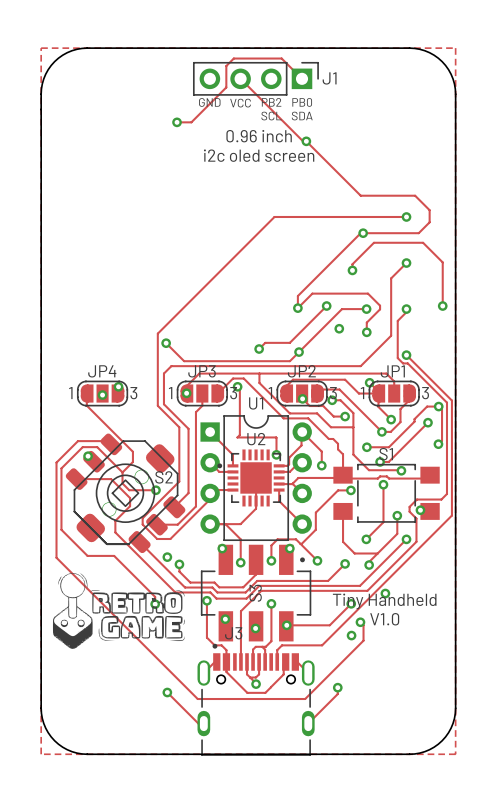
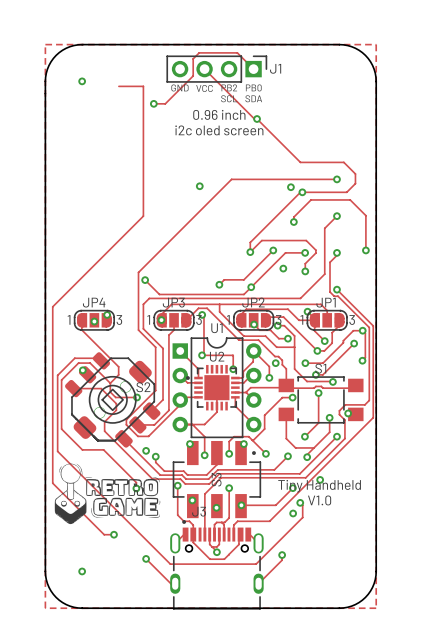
via: none -> (82, 81)
track: none -> (118, 86) (143, 86) (143, 216) (52, 306) (52, 483) (104, 534) (114, 534)
via: none -> (199, 186)
via: none -> (290, 187)
via: none -> (202, 355)
via: none -> (275, 363)
via: none -> (114, 534)
via: none -> (82, 571)

